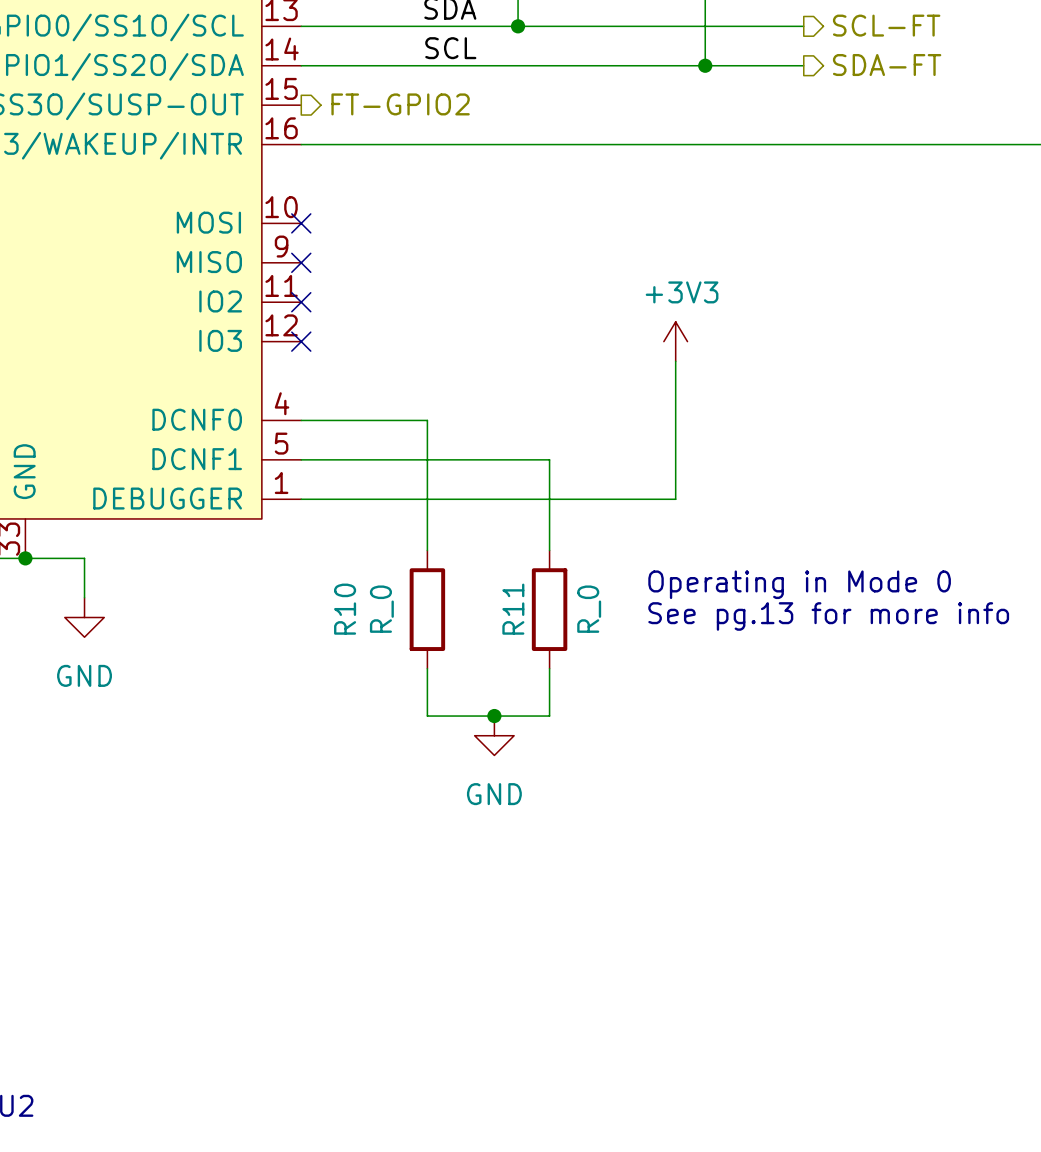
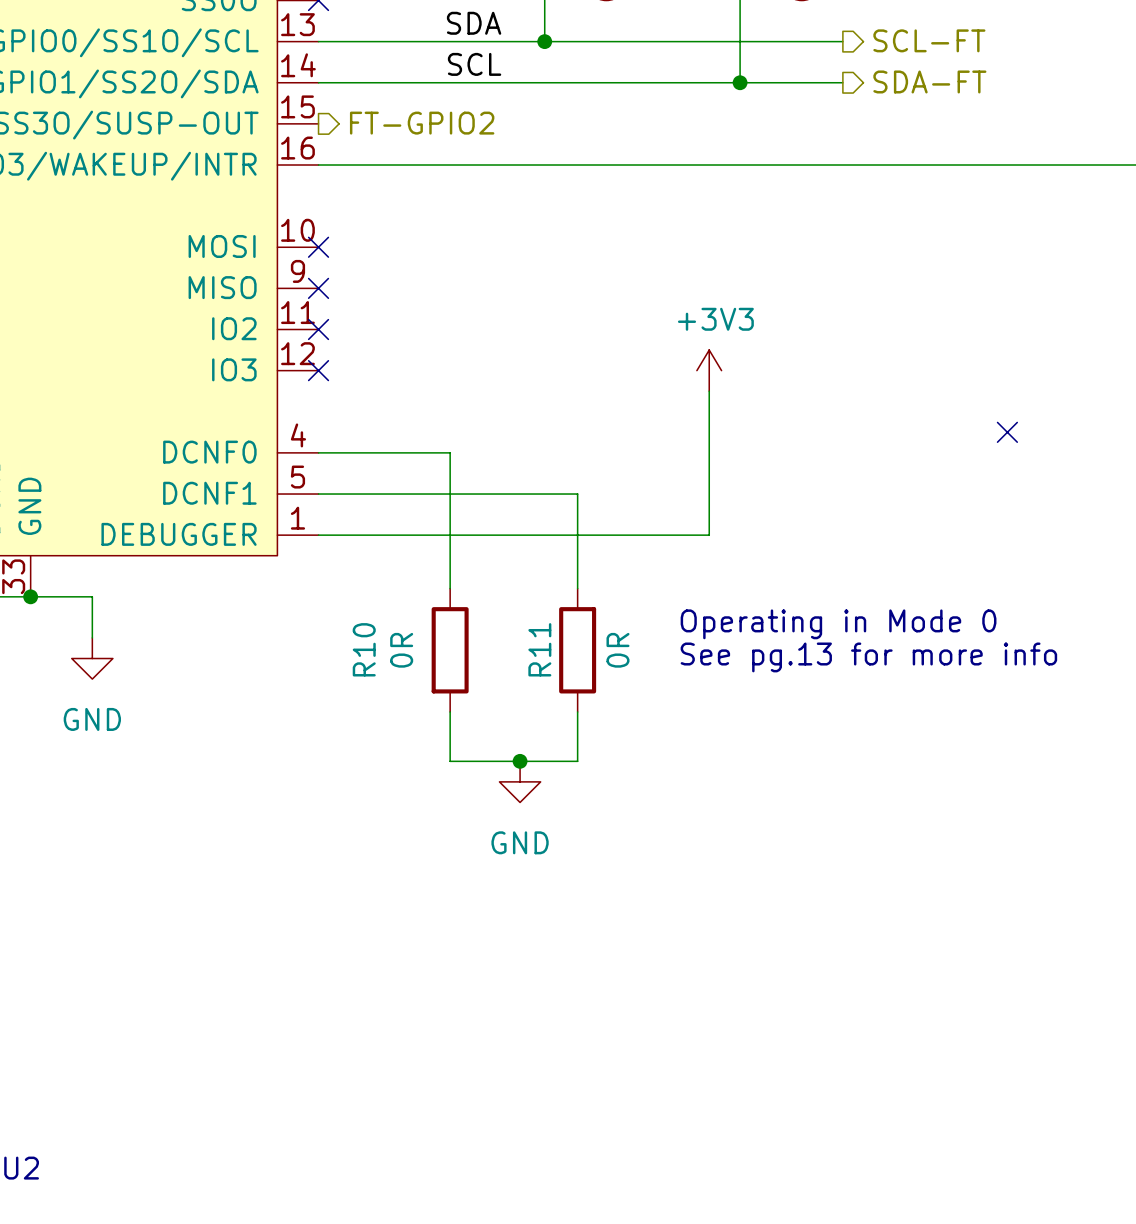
no-connect mark: none -> (1007, 432)
R10 value: R_0 (381, 609) -> 0R (401, 650)
R11 value: R_0 (589, 609) -> 0R (617, 650)

